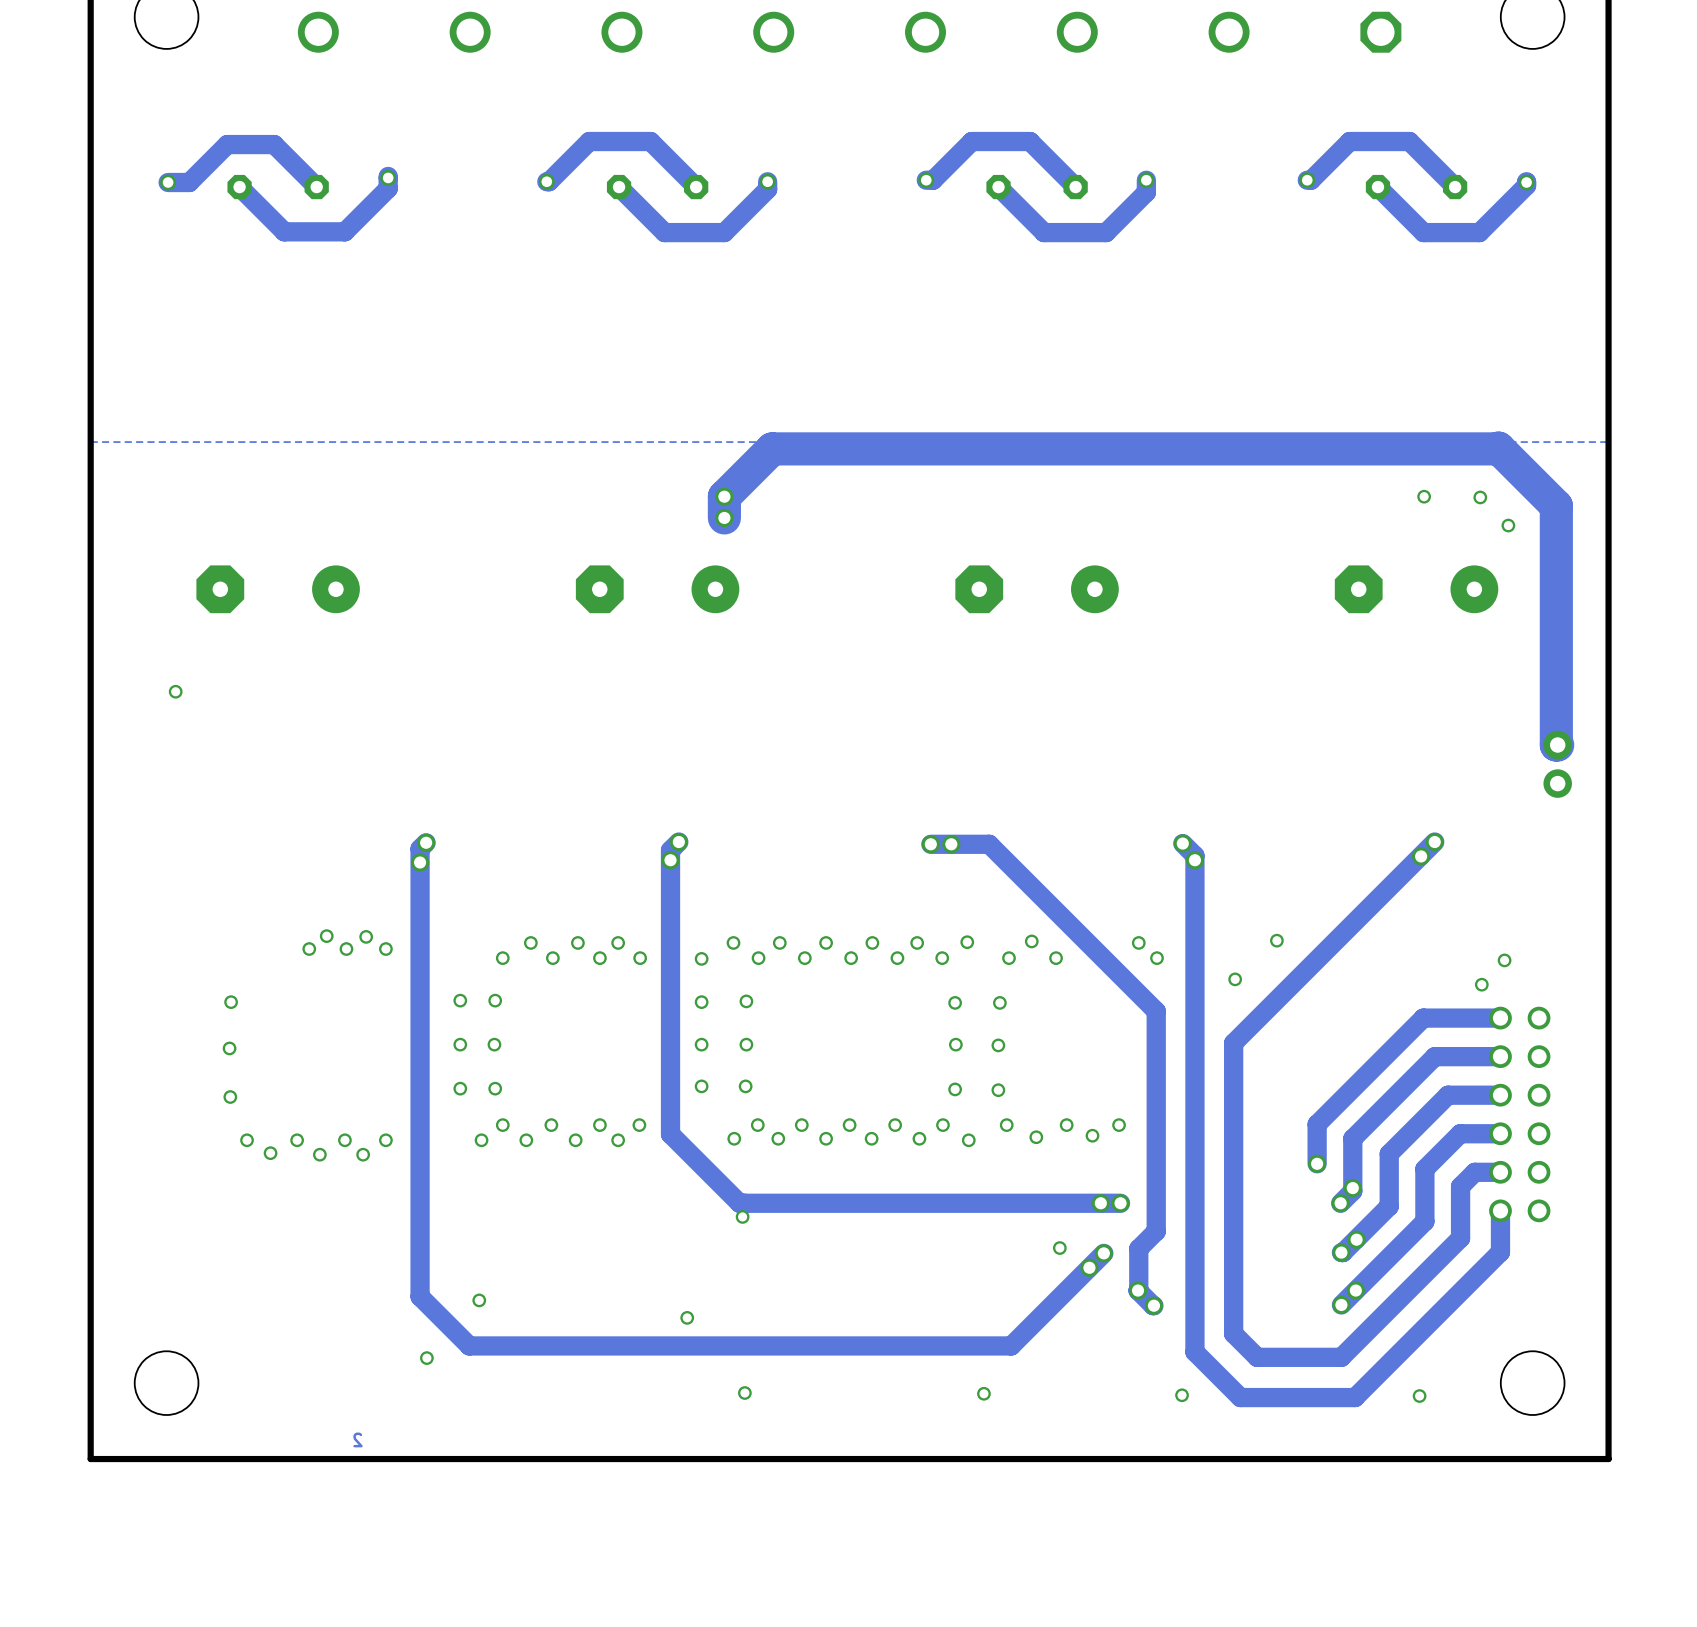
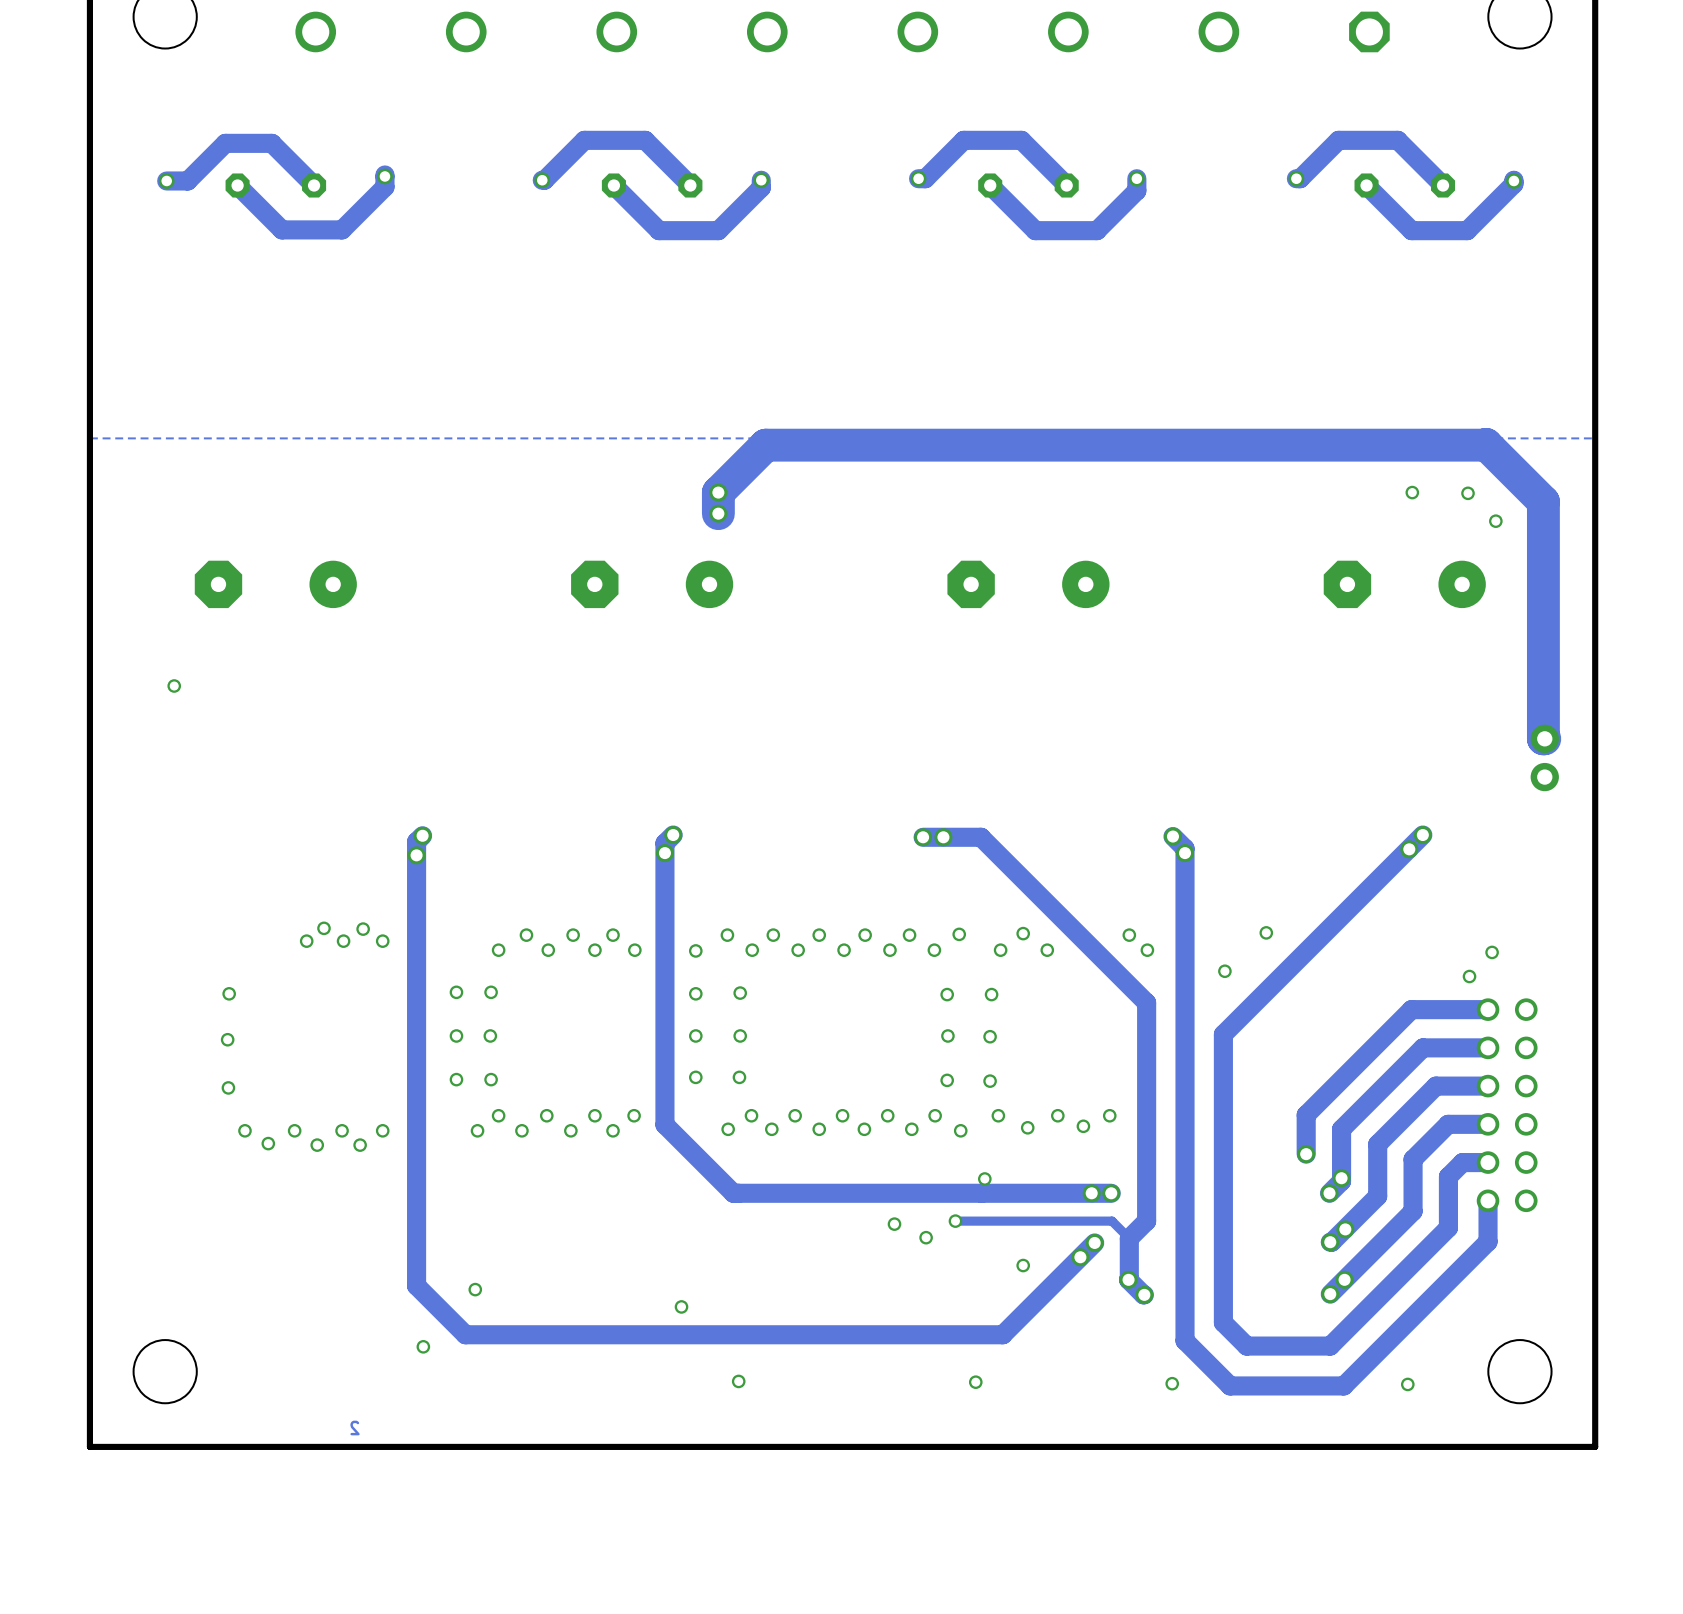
via: none -> (984, 1178)
via: (742, 1216) -> none
track: none -> (955, 1221) (1112, 1221) (1129, 1238)
via: none -> (955, 1221)
via: none -> (894, 1224)
via: none -> (926, 1237)
via position: (1059, 1248) -> (1023, 1265)

